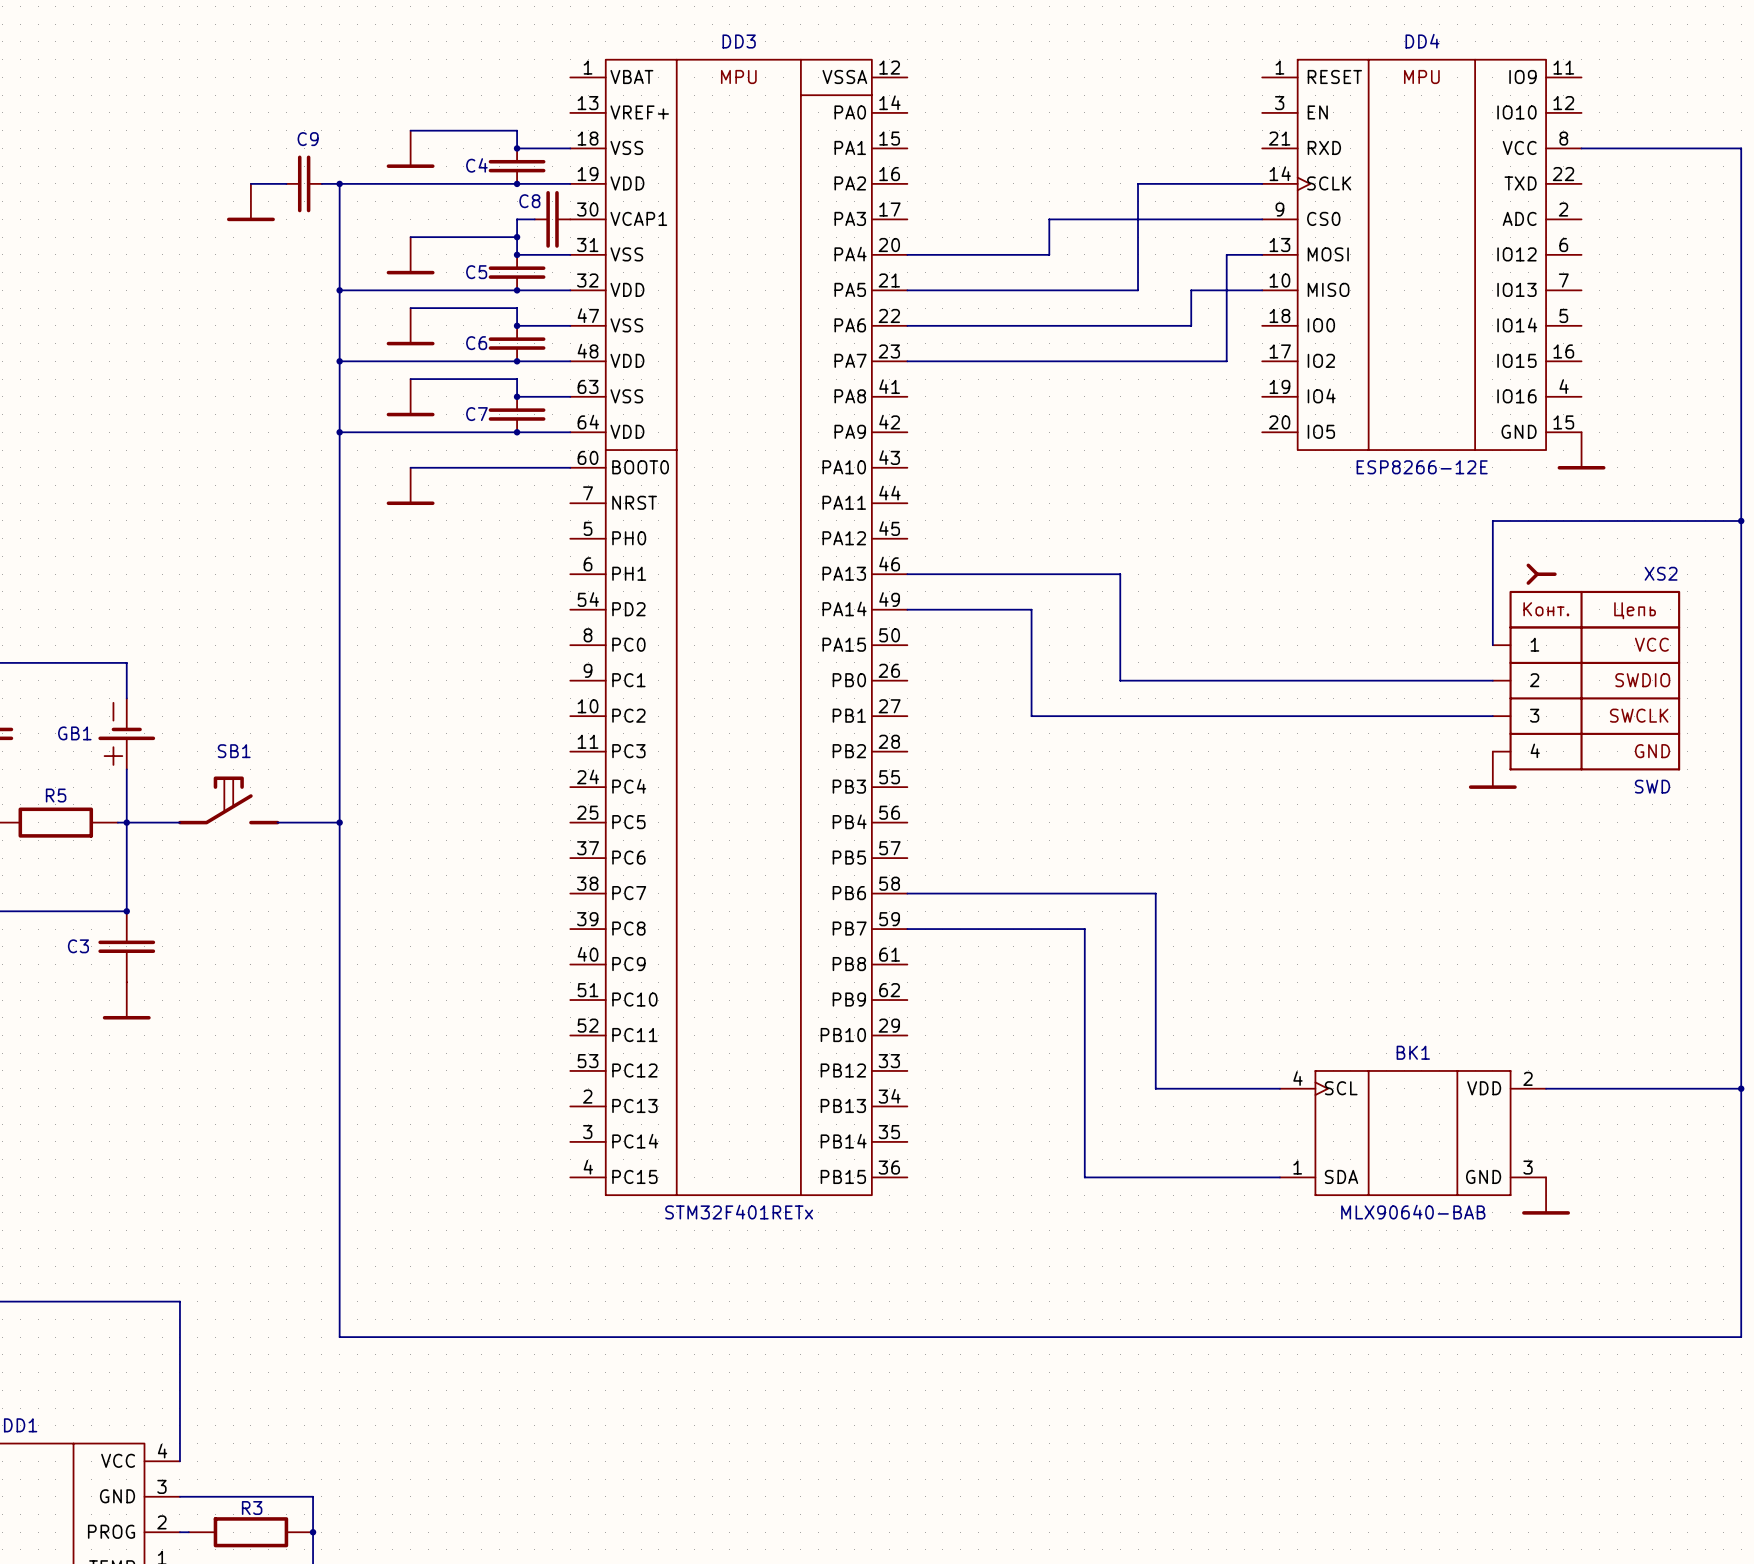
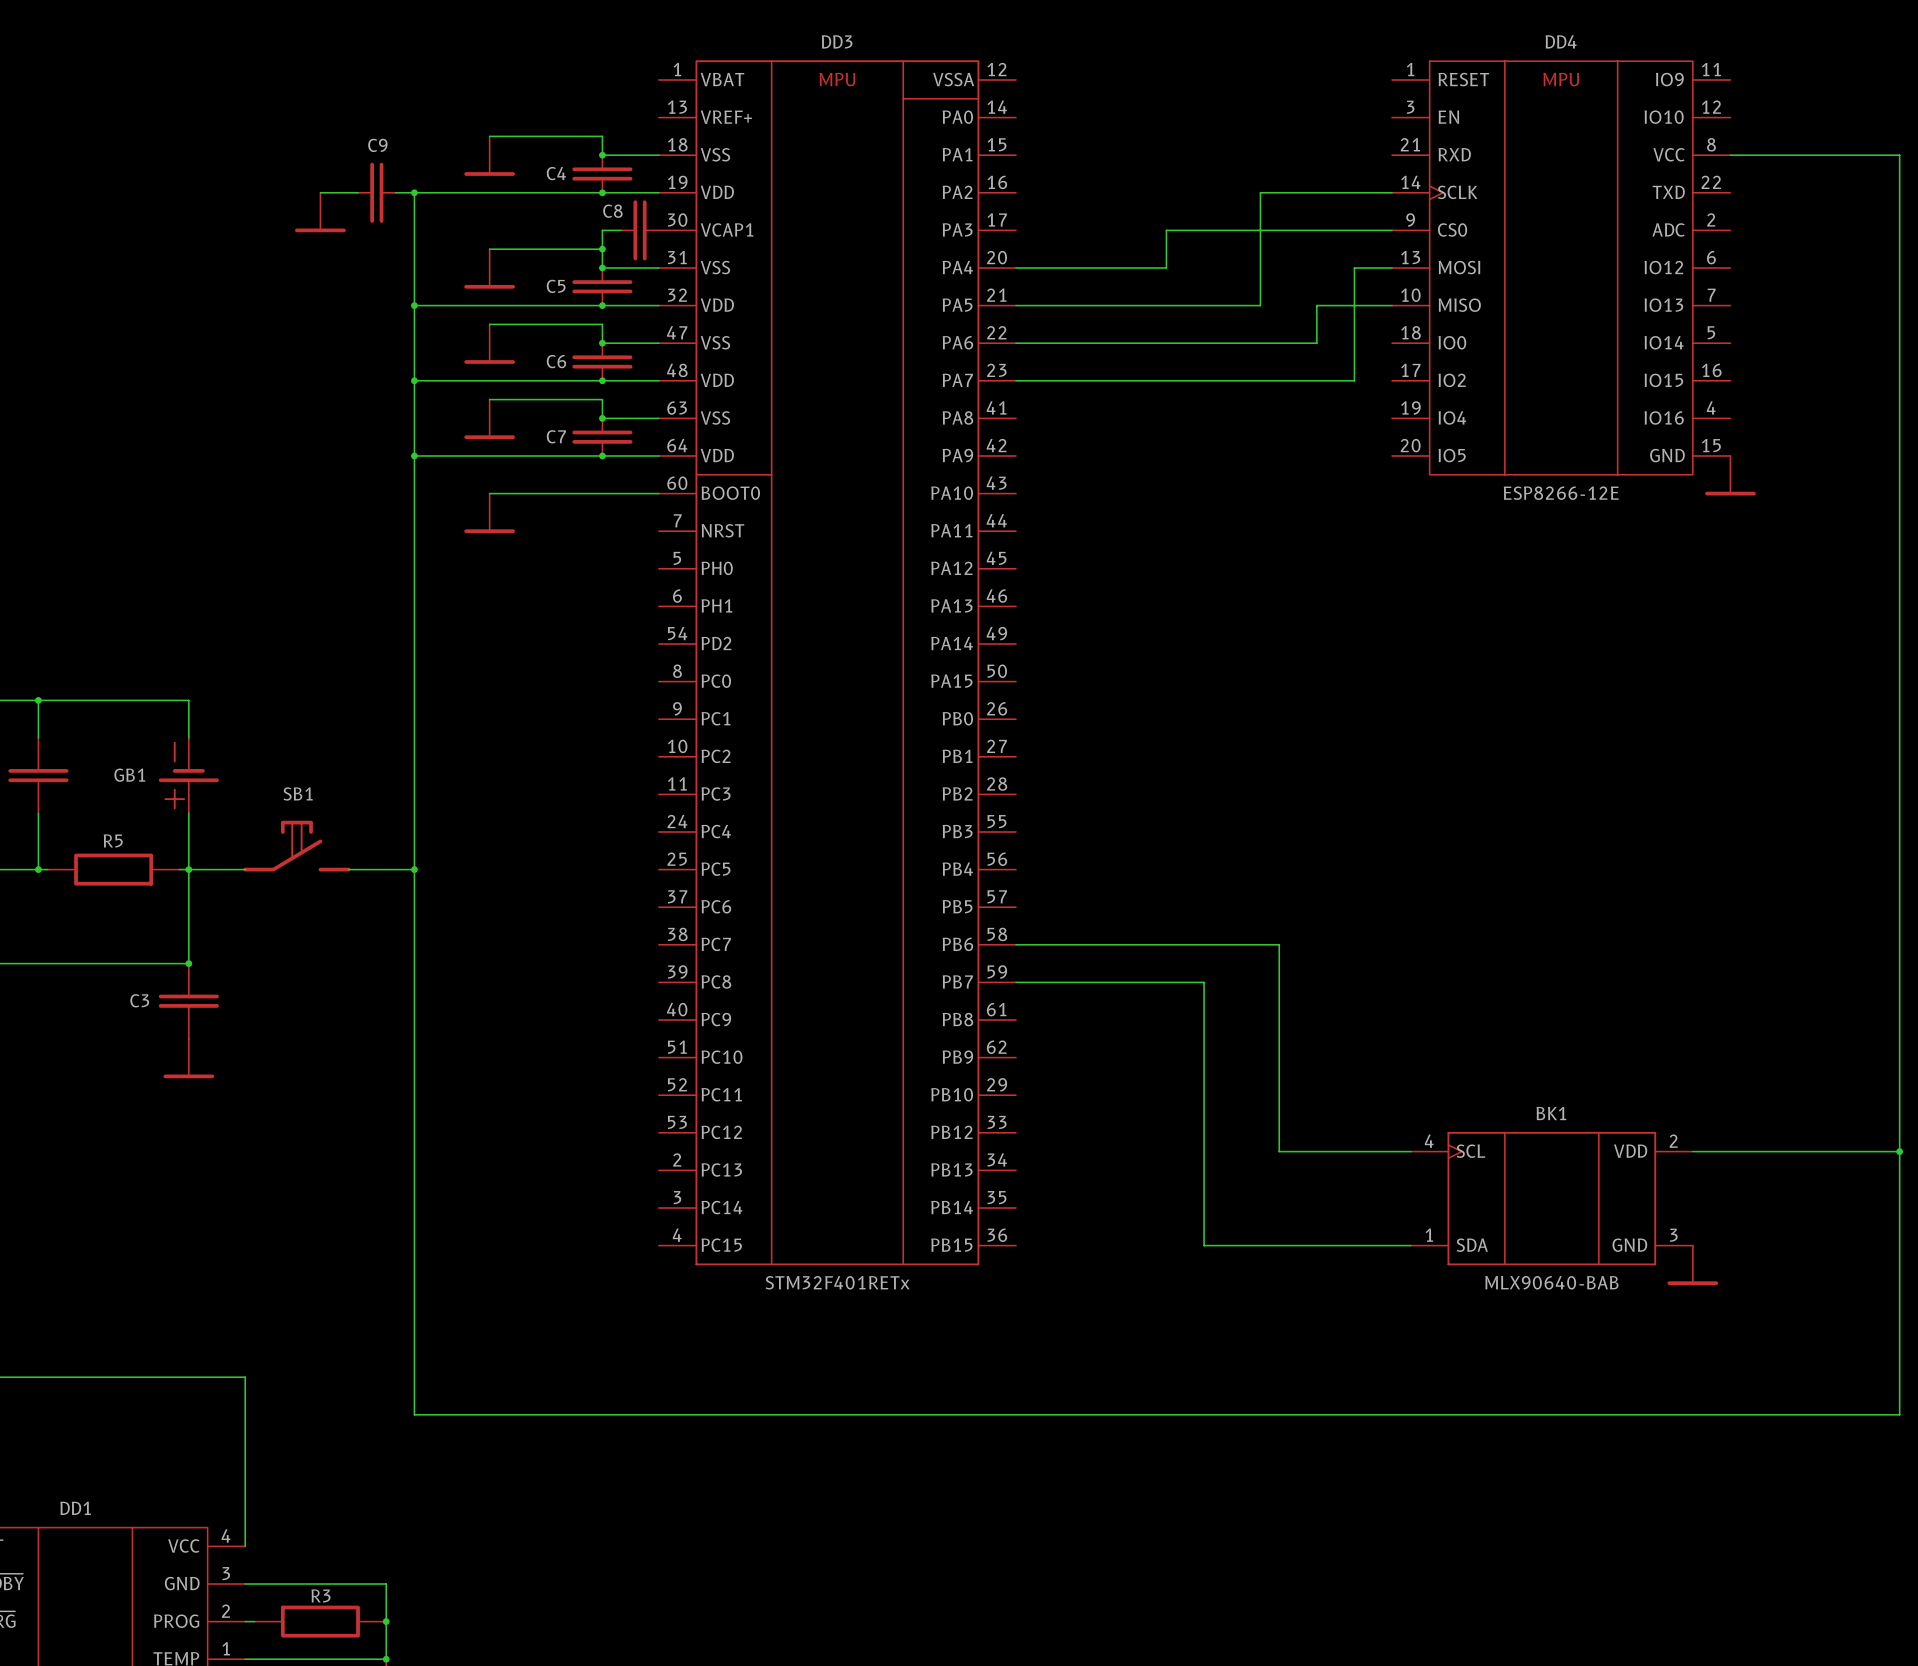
wire: (1741, 520) (1492, 520) (1492, 645) -> none
junction: (1741, 520) -> none
wire: (907, 574) (1120, 574) (1120, 680) (1492, 680) -> none
wire: (907, 609) (1031, 609) (1031, 716) (1492, 716) -> none
XS2: SWD (1586, 667) -> none
power symbol: (1492, 770) -> none

